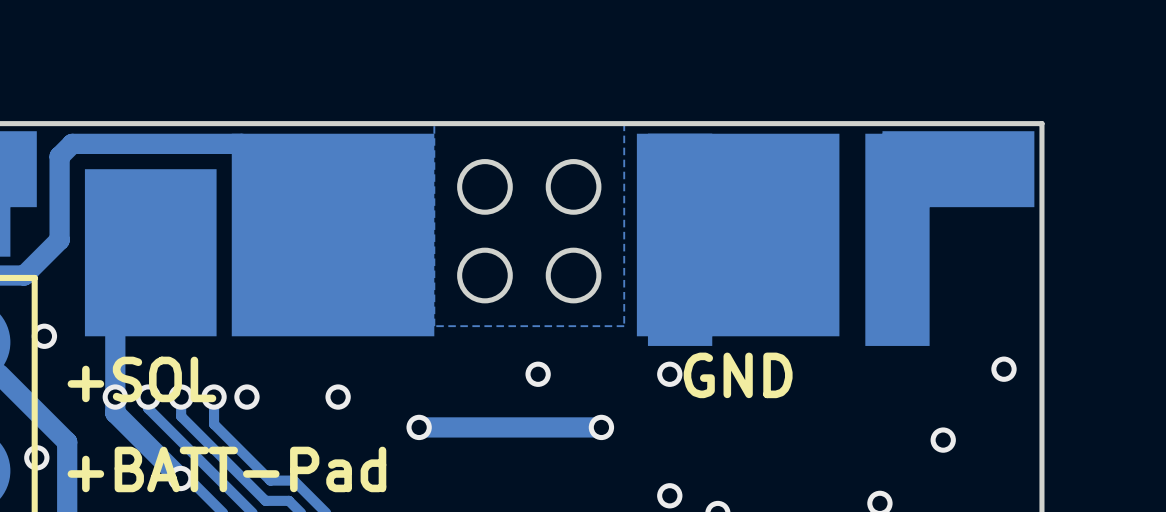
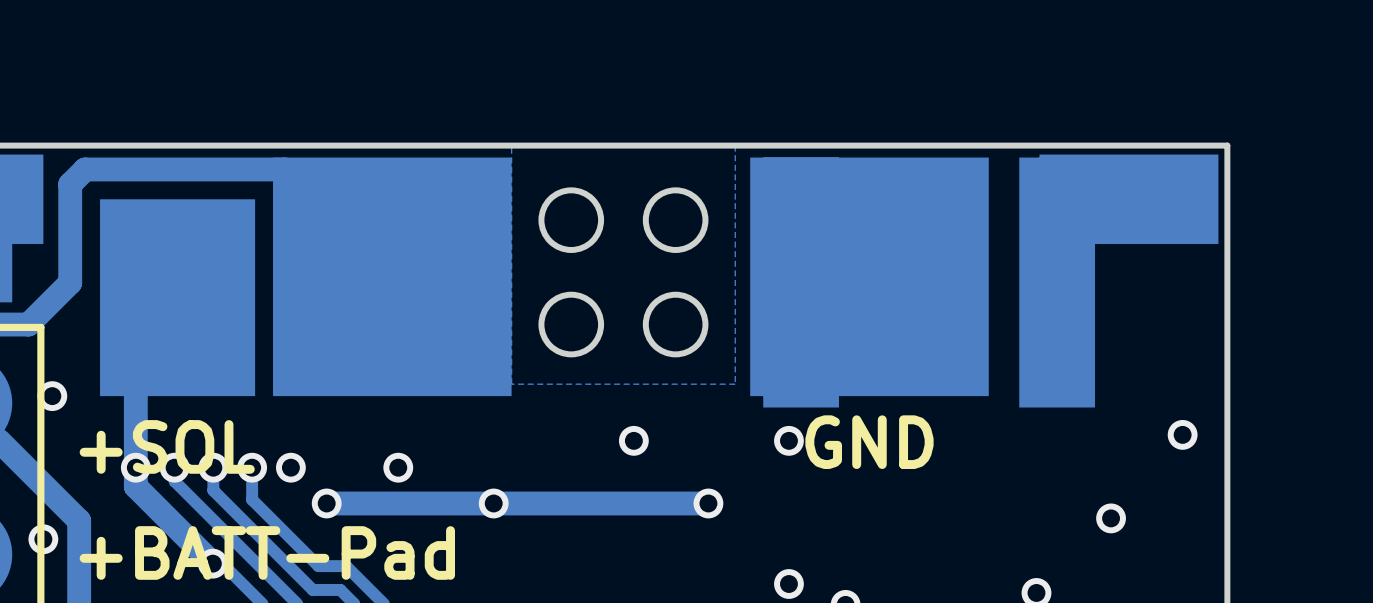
via: none -> (326, 503)
track: none -> (493, 503) (326, 503)

